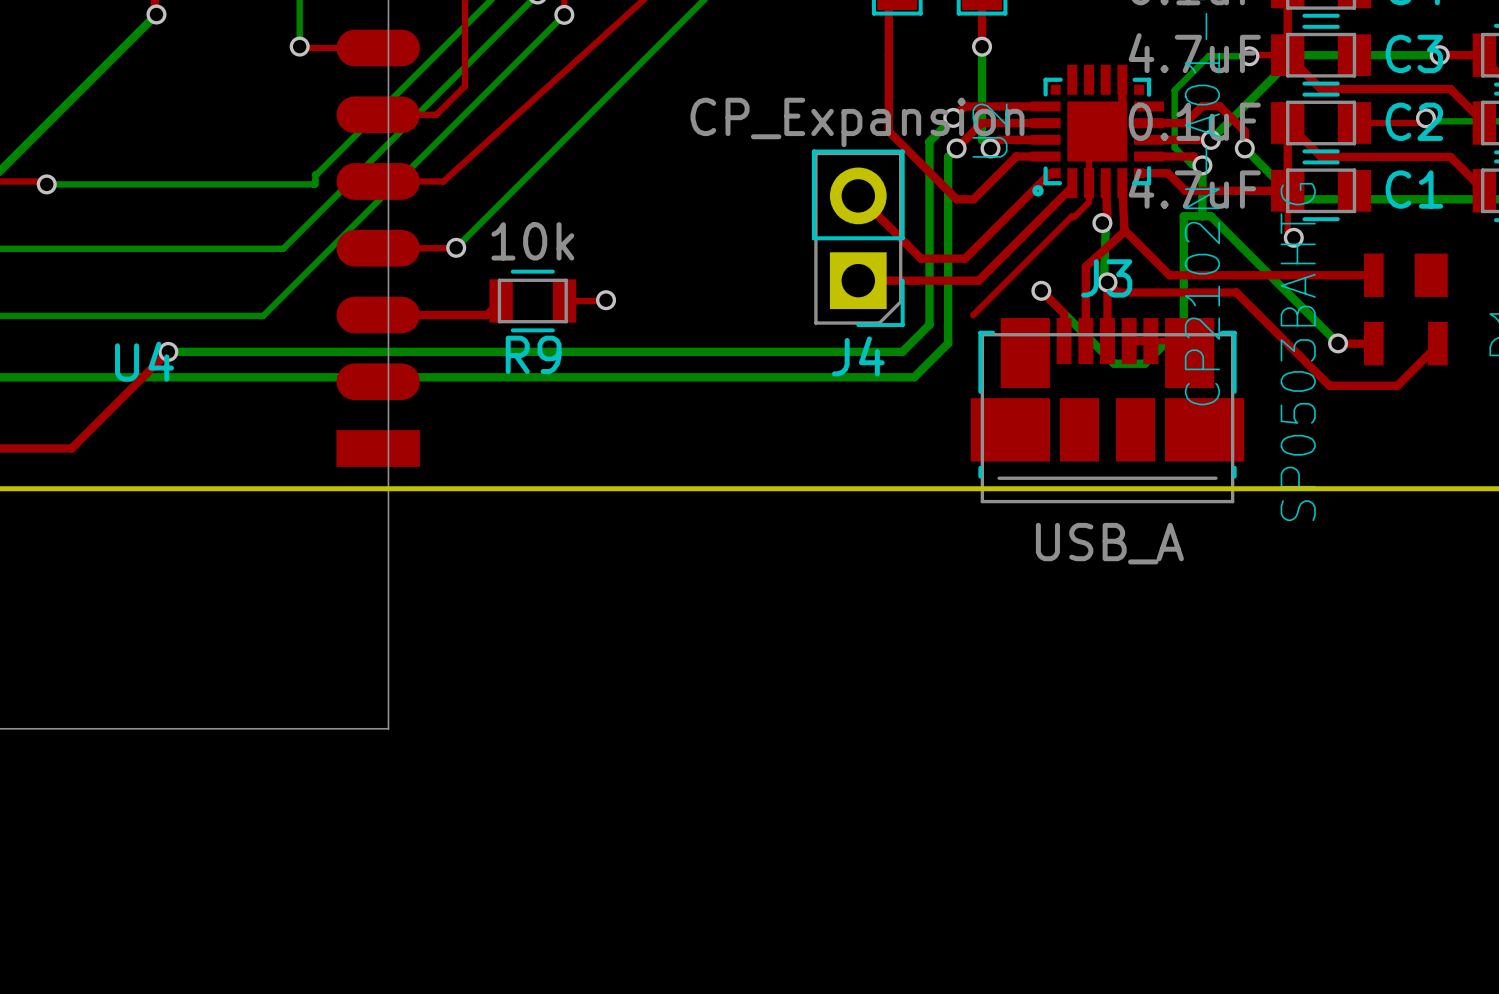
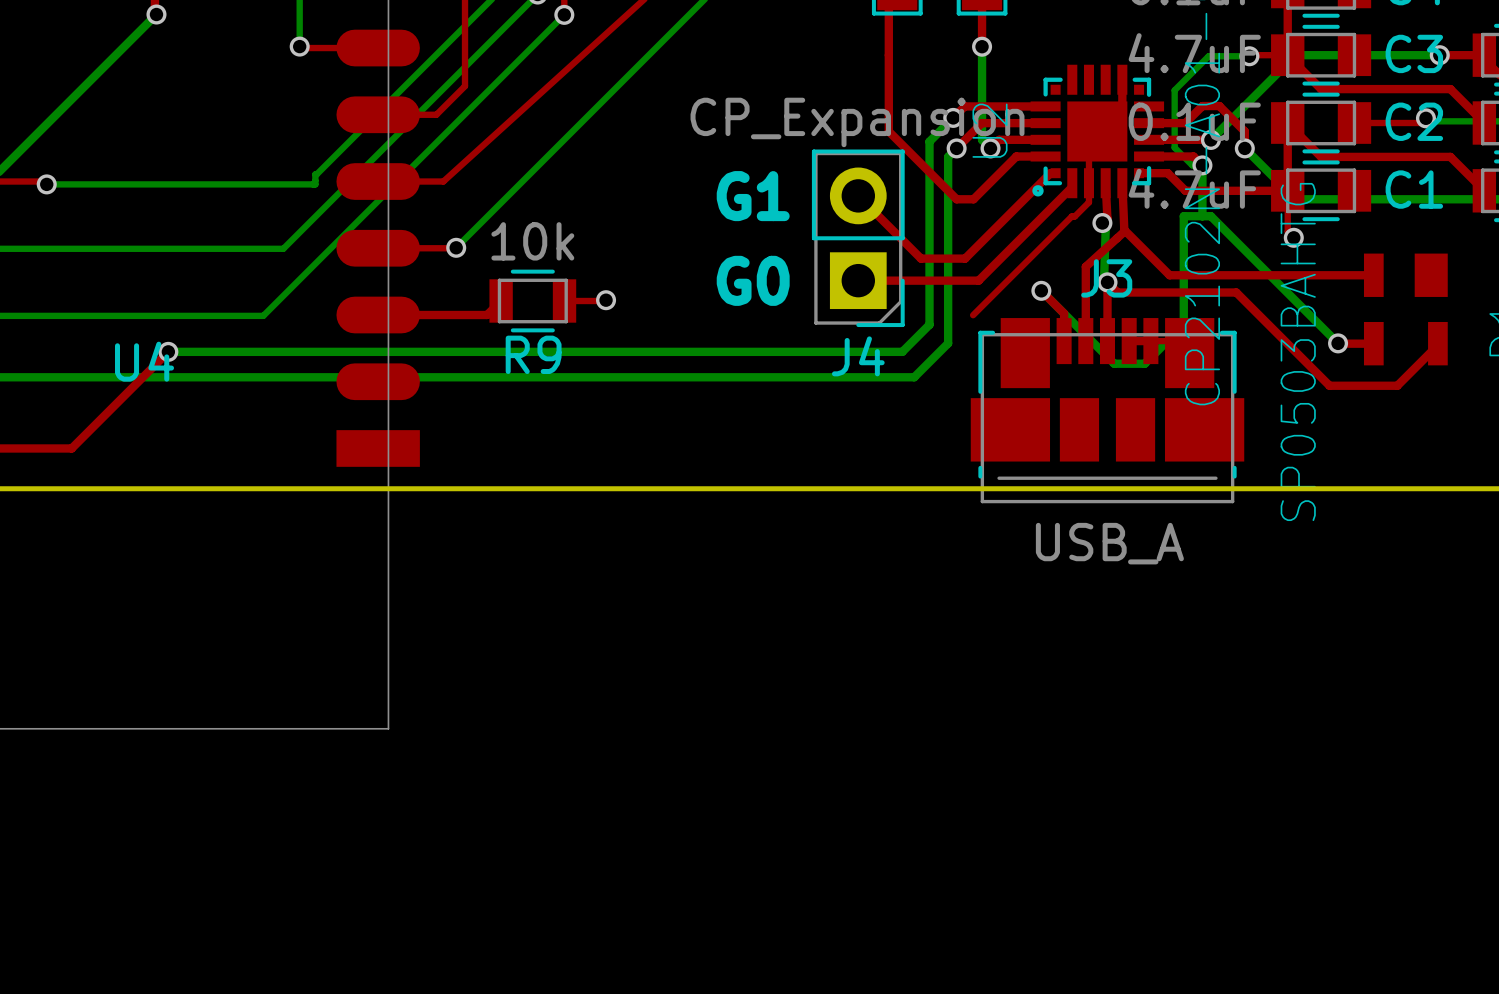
text: none -> G1 (753, 196)
text: none -> G0 (753, 280)

